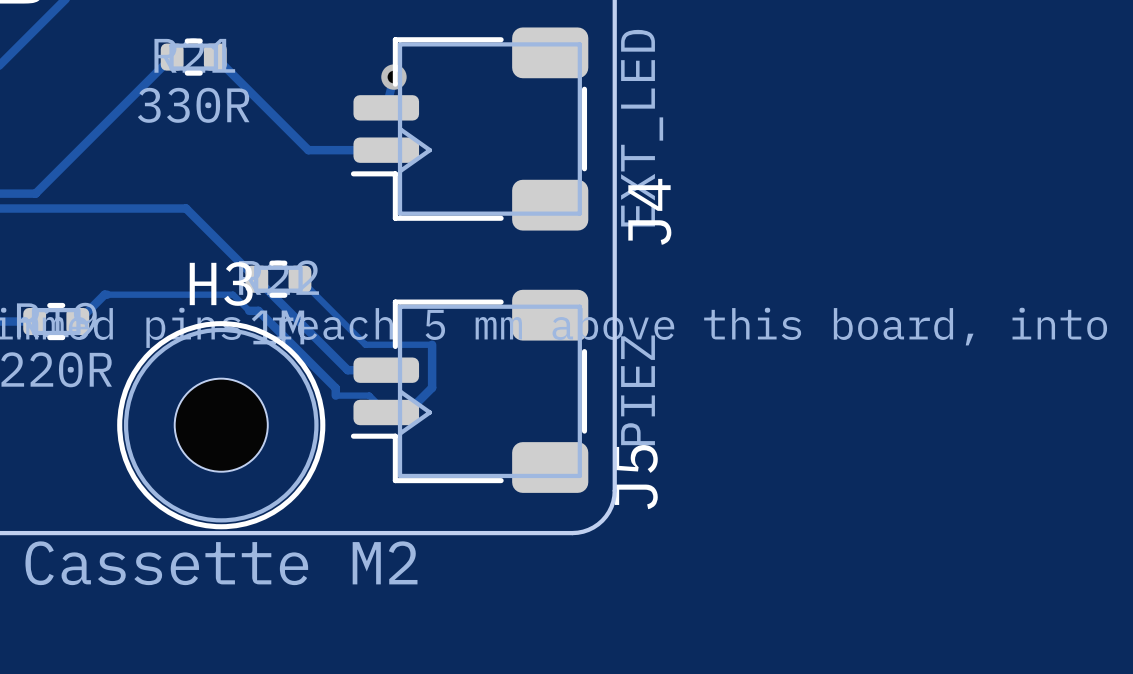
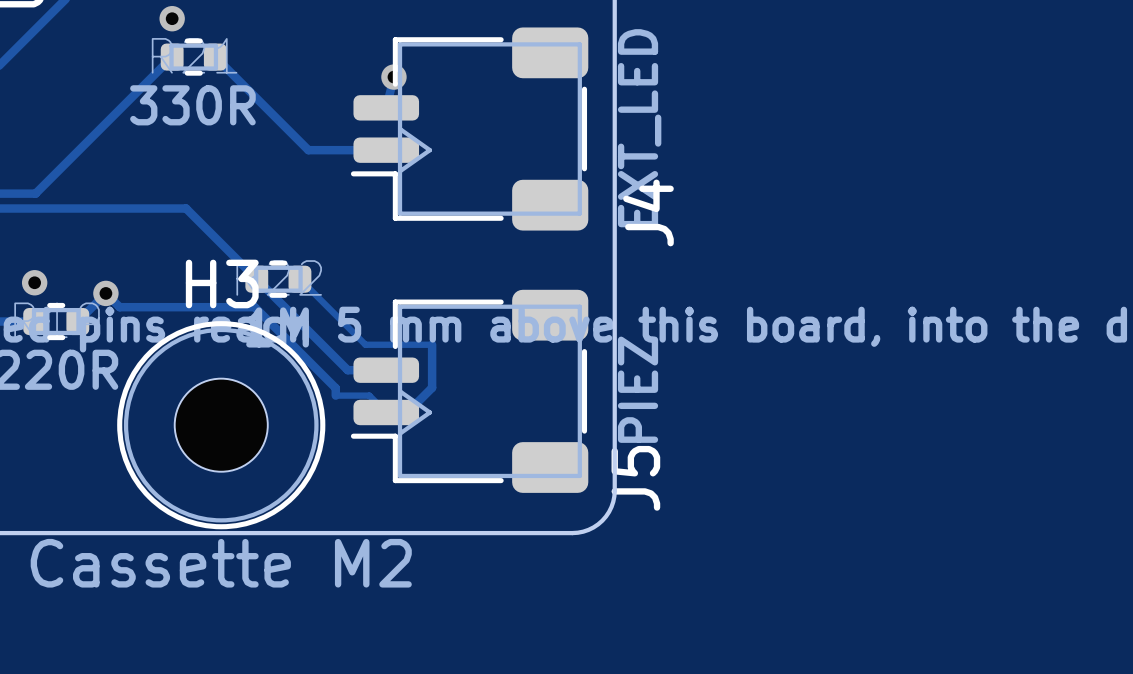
via: none -> (172, 18)
via: none -> (34, 282)
via: none -> (105, 293)
track: (104, 294) (233, 294) (249, 310) (258, 310) -> (104, 294) (105, 293) (119, 307) (254, 307) (258, 310)

